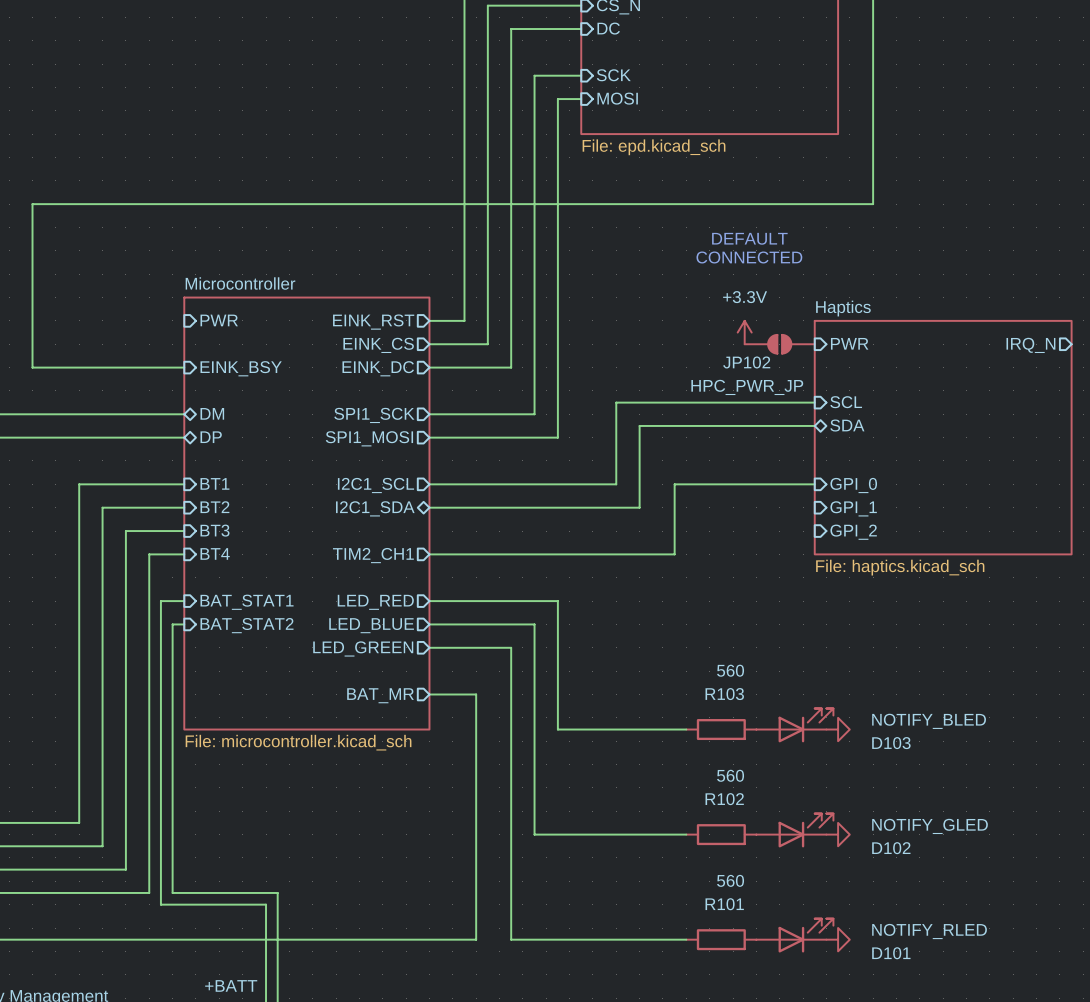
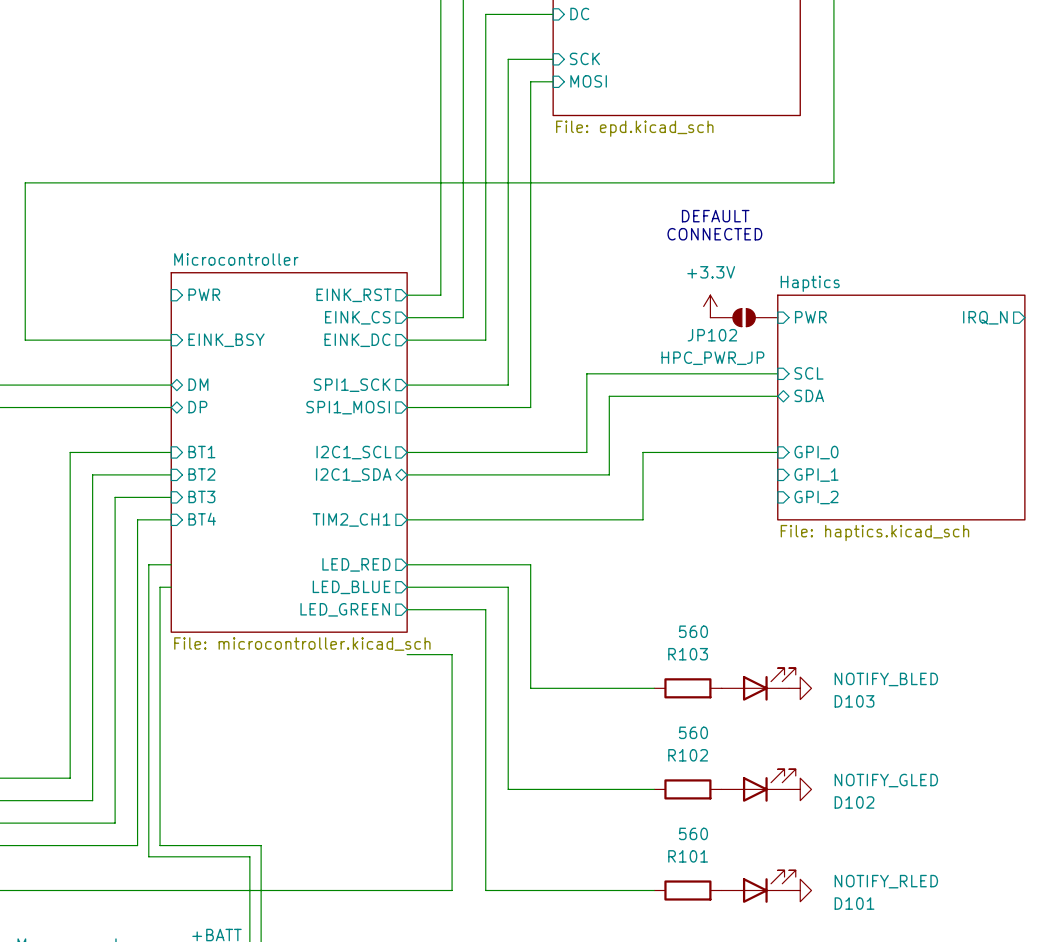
sheet Microcontroller: none -> File: microcontroller.kicad_sch (289, 452)
sheet Microcontroller: File: microcontroller.kicad_sch (306, 513) -> none
sheet pin: BAT_STAT1 (247, 602) -> none
sheet pin: BAT_STAT2 (247, 625) -> none
sheet pin: BAT_MR (380, 695) -> none

